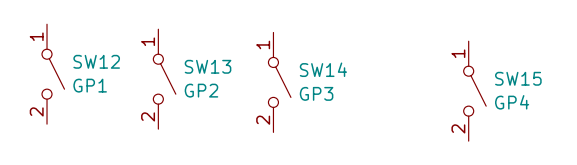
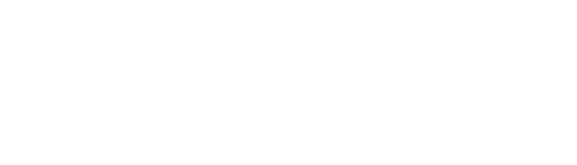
SW12: GP1 (53, 74) -> none
SW13: GP2 (164, 79) -> none
SW14: GP3 (279, 82) -> none
SW15: GP4 (474, 91) -> none

